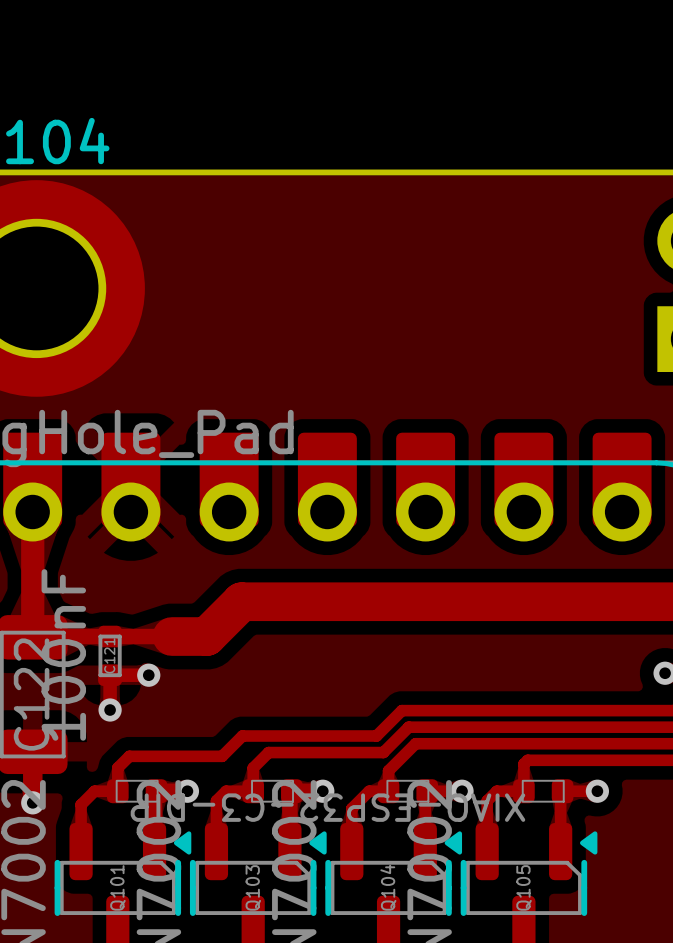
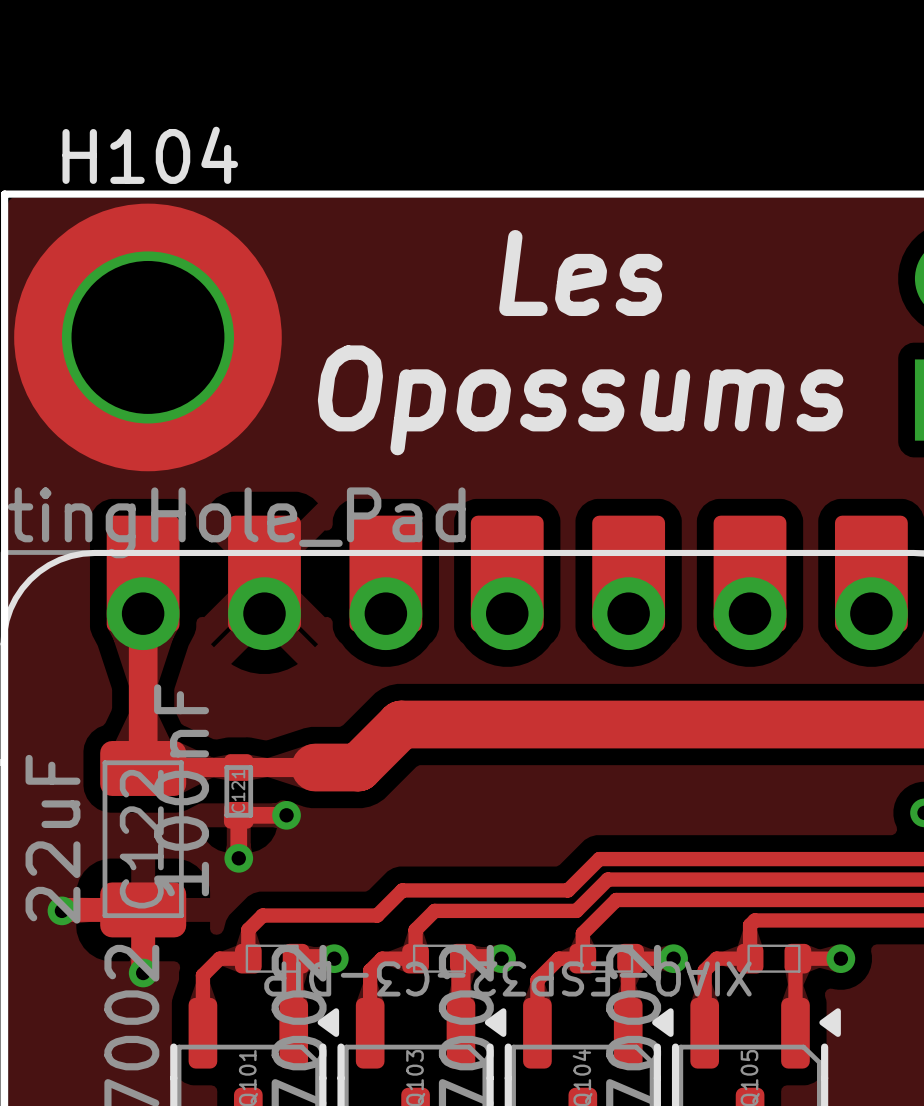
text: none -> Les (580, 273)
text: none -> Opossums (580, 400)

